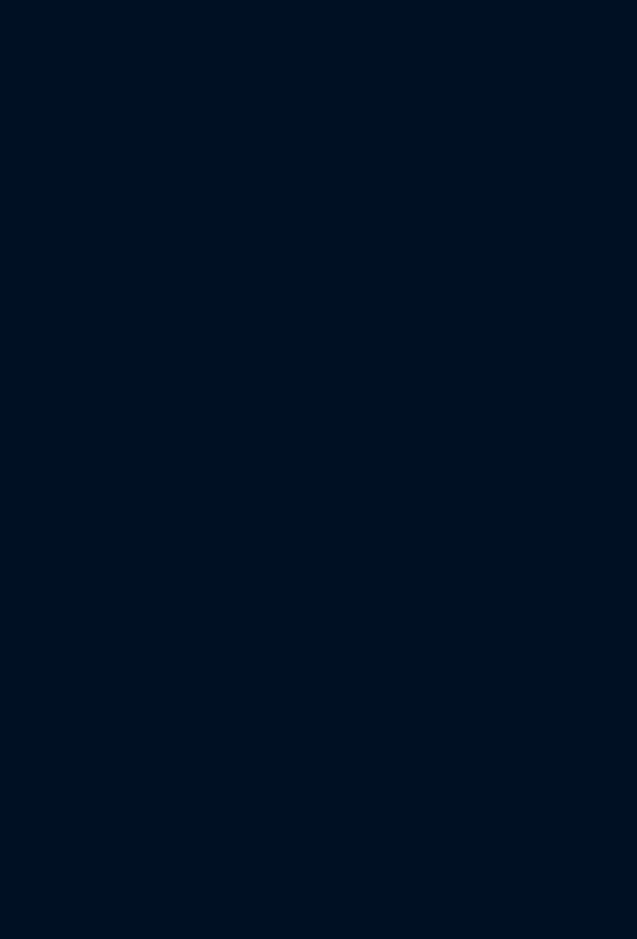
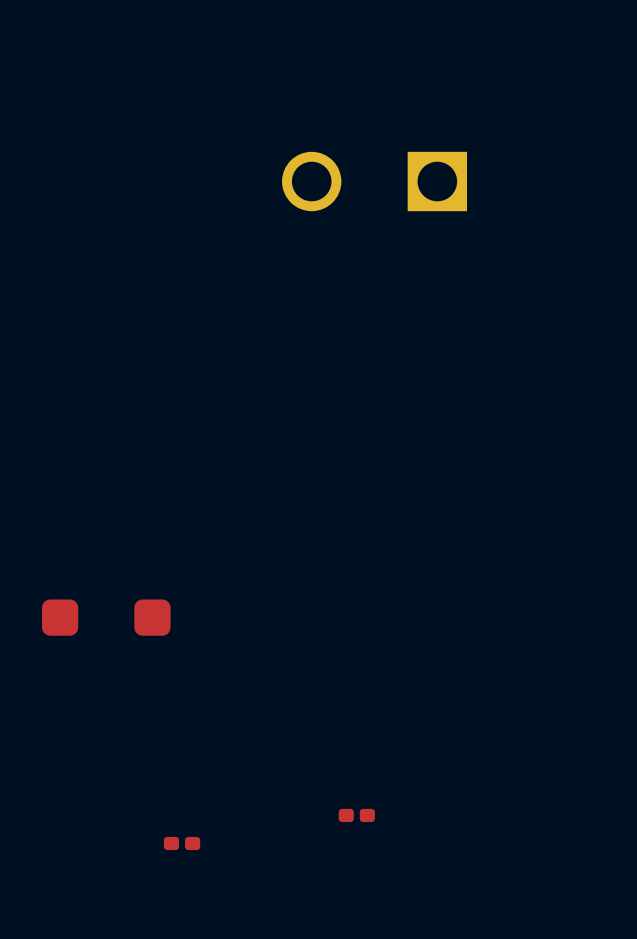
part: none -> (374, 181)
part: none -> (106, 617)
part: none -> (356, 815)
part: none -> (182, 843)

